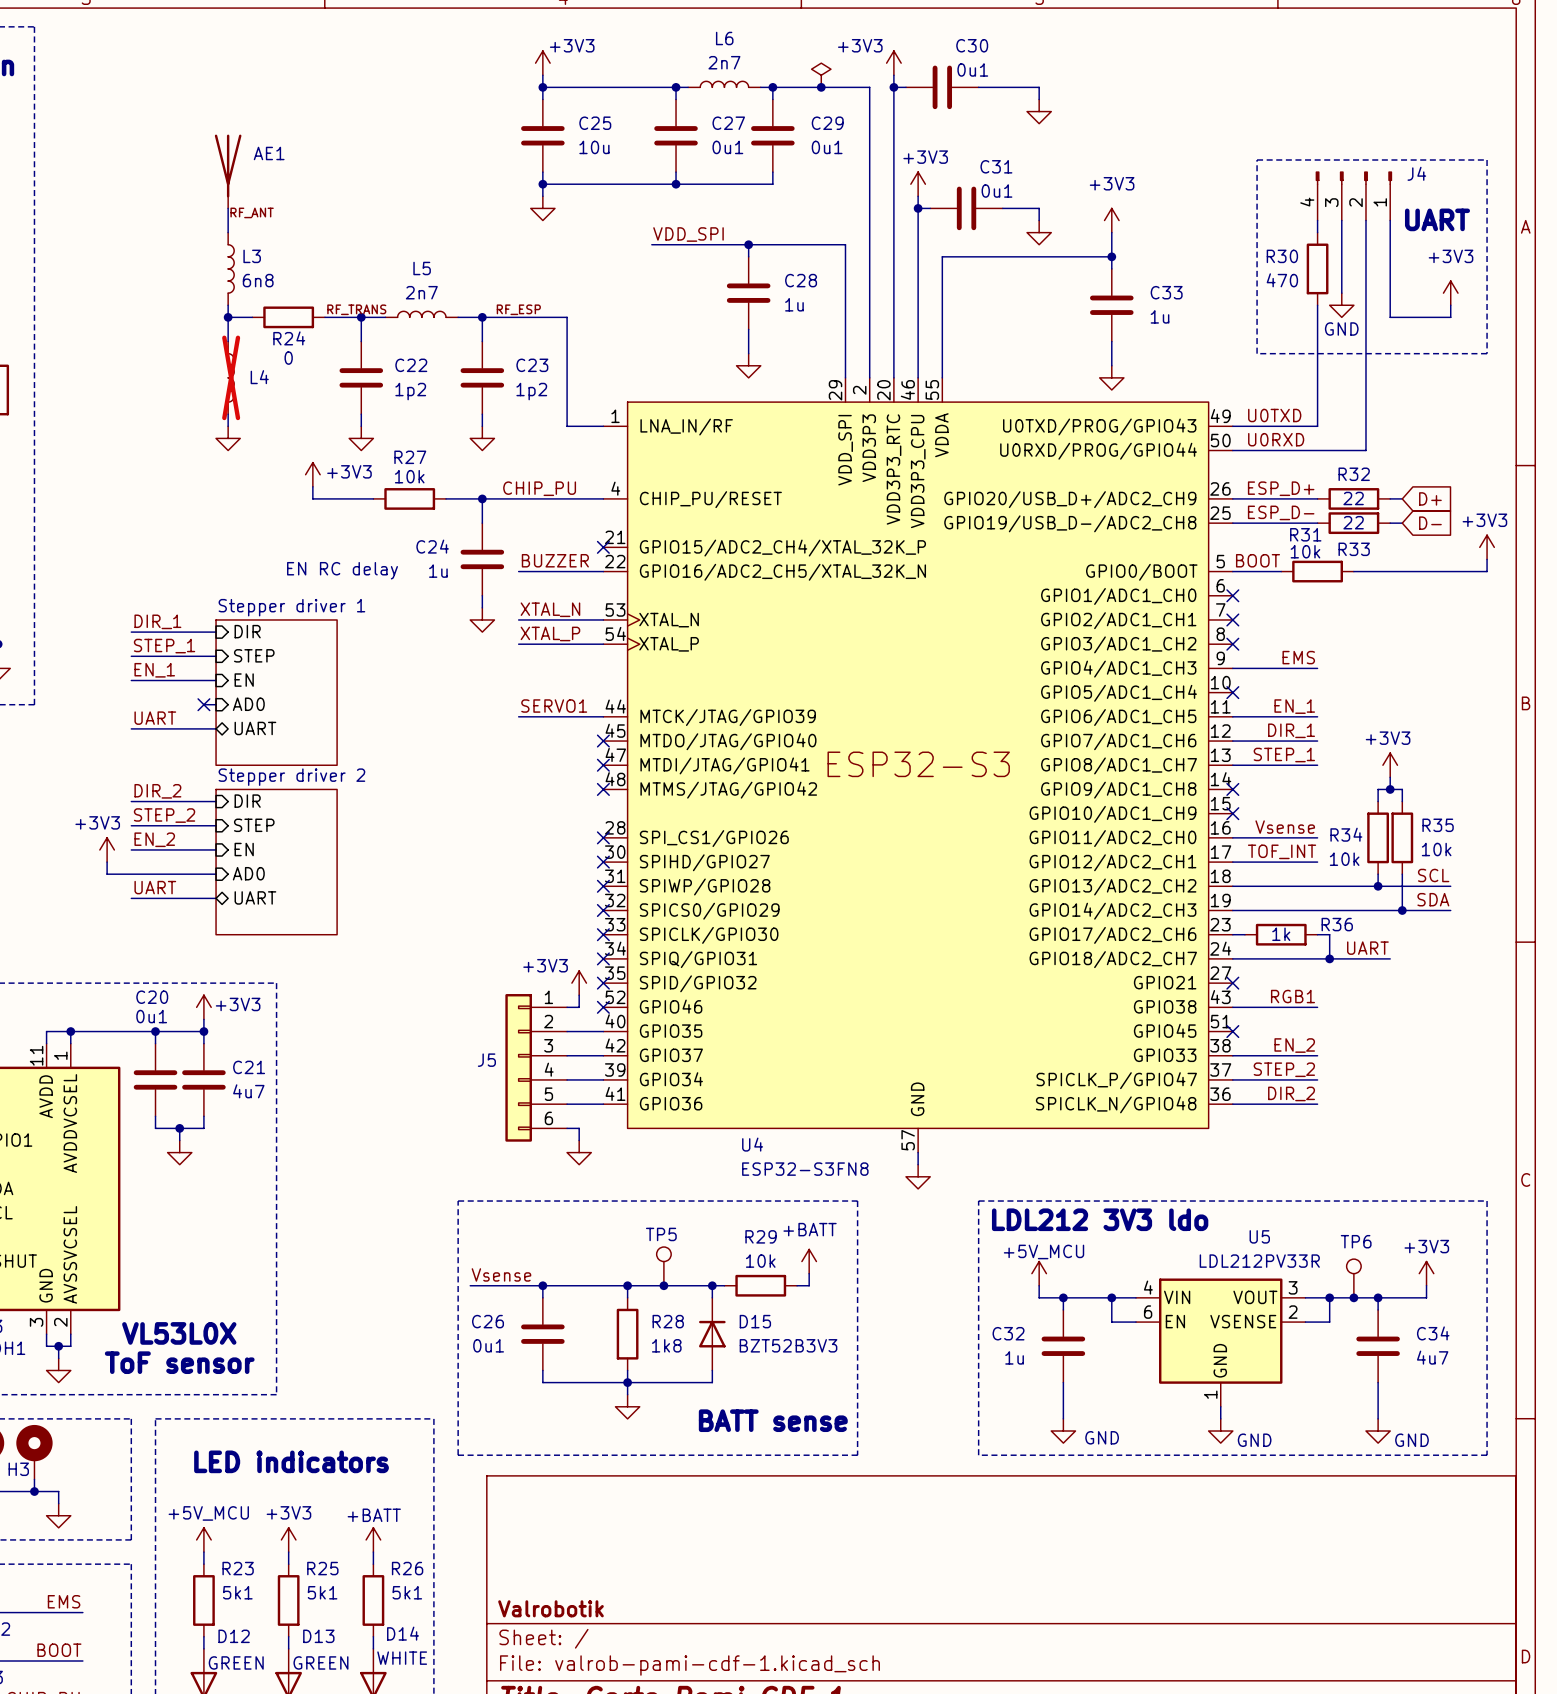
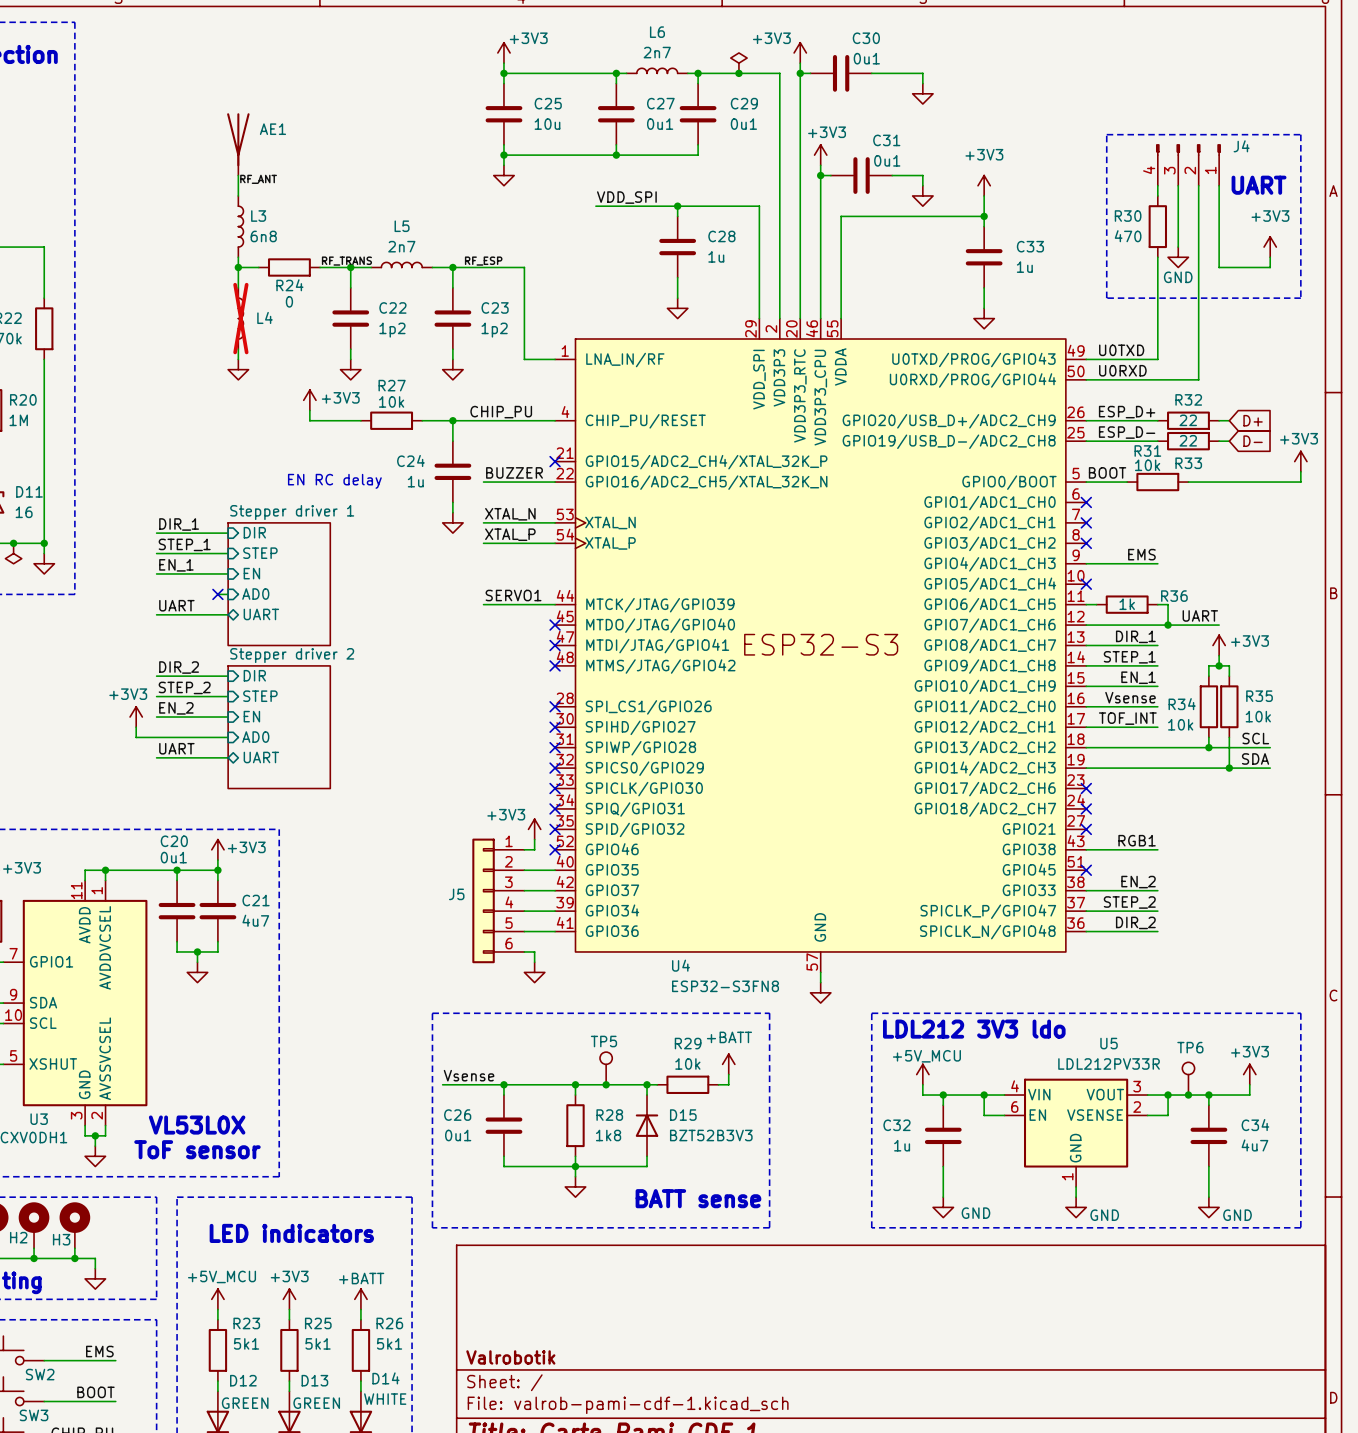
label position: EN_1 (1294, 706) -> EN_1 (1138, 677)
wire: (1244, 716) (1317, 716) -> (1168, 625) (1168, 604) (1157, 604)
label: DIR_1 (1291, 730) -> none
power symbol text position: +3V3 (1388, 738) -> +3V3 (1250, 641)
wire: none -> (1157, 625) (1219, 625)
junction: none -> (1168, 625)
label: STEP_1 (1284, 755) -> DIR_1 (1135, 636)
label: none -> STEP_1 (1129, 657)
wire: none -> (1086, 665) (1157, 665)
no-connect mark: (1232, 789) -> none
wire: none -> (1086, 686) (1157, 686)
no-connect mark: (1232, 813) -> none
wire: (1232, 934) (1244, 934) -> none
no-connect mark: none -> (1086, 788)
R36 position: (1281, 934) -> (1127, 604)
wire: (1317, 934) (1329, 934) (1329, 958) -> none
label position: UART (1367, 948) -> UART (1200, 615)
wire: (1232, 958) (1390, 958) -> none
no-connect mark: none -> (1086, 808)
junction: (1329, 958) -> none

